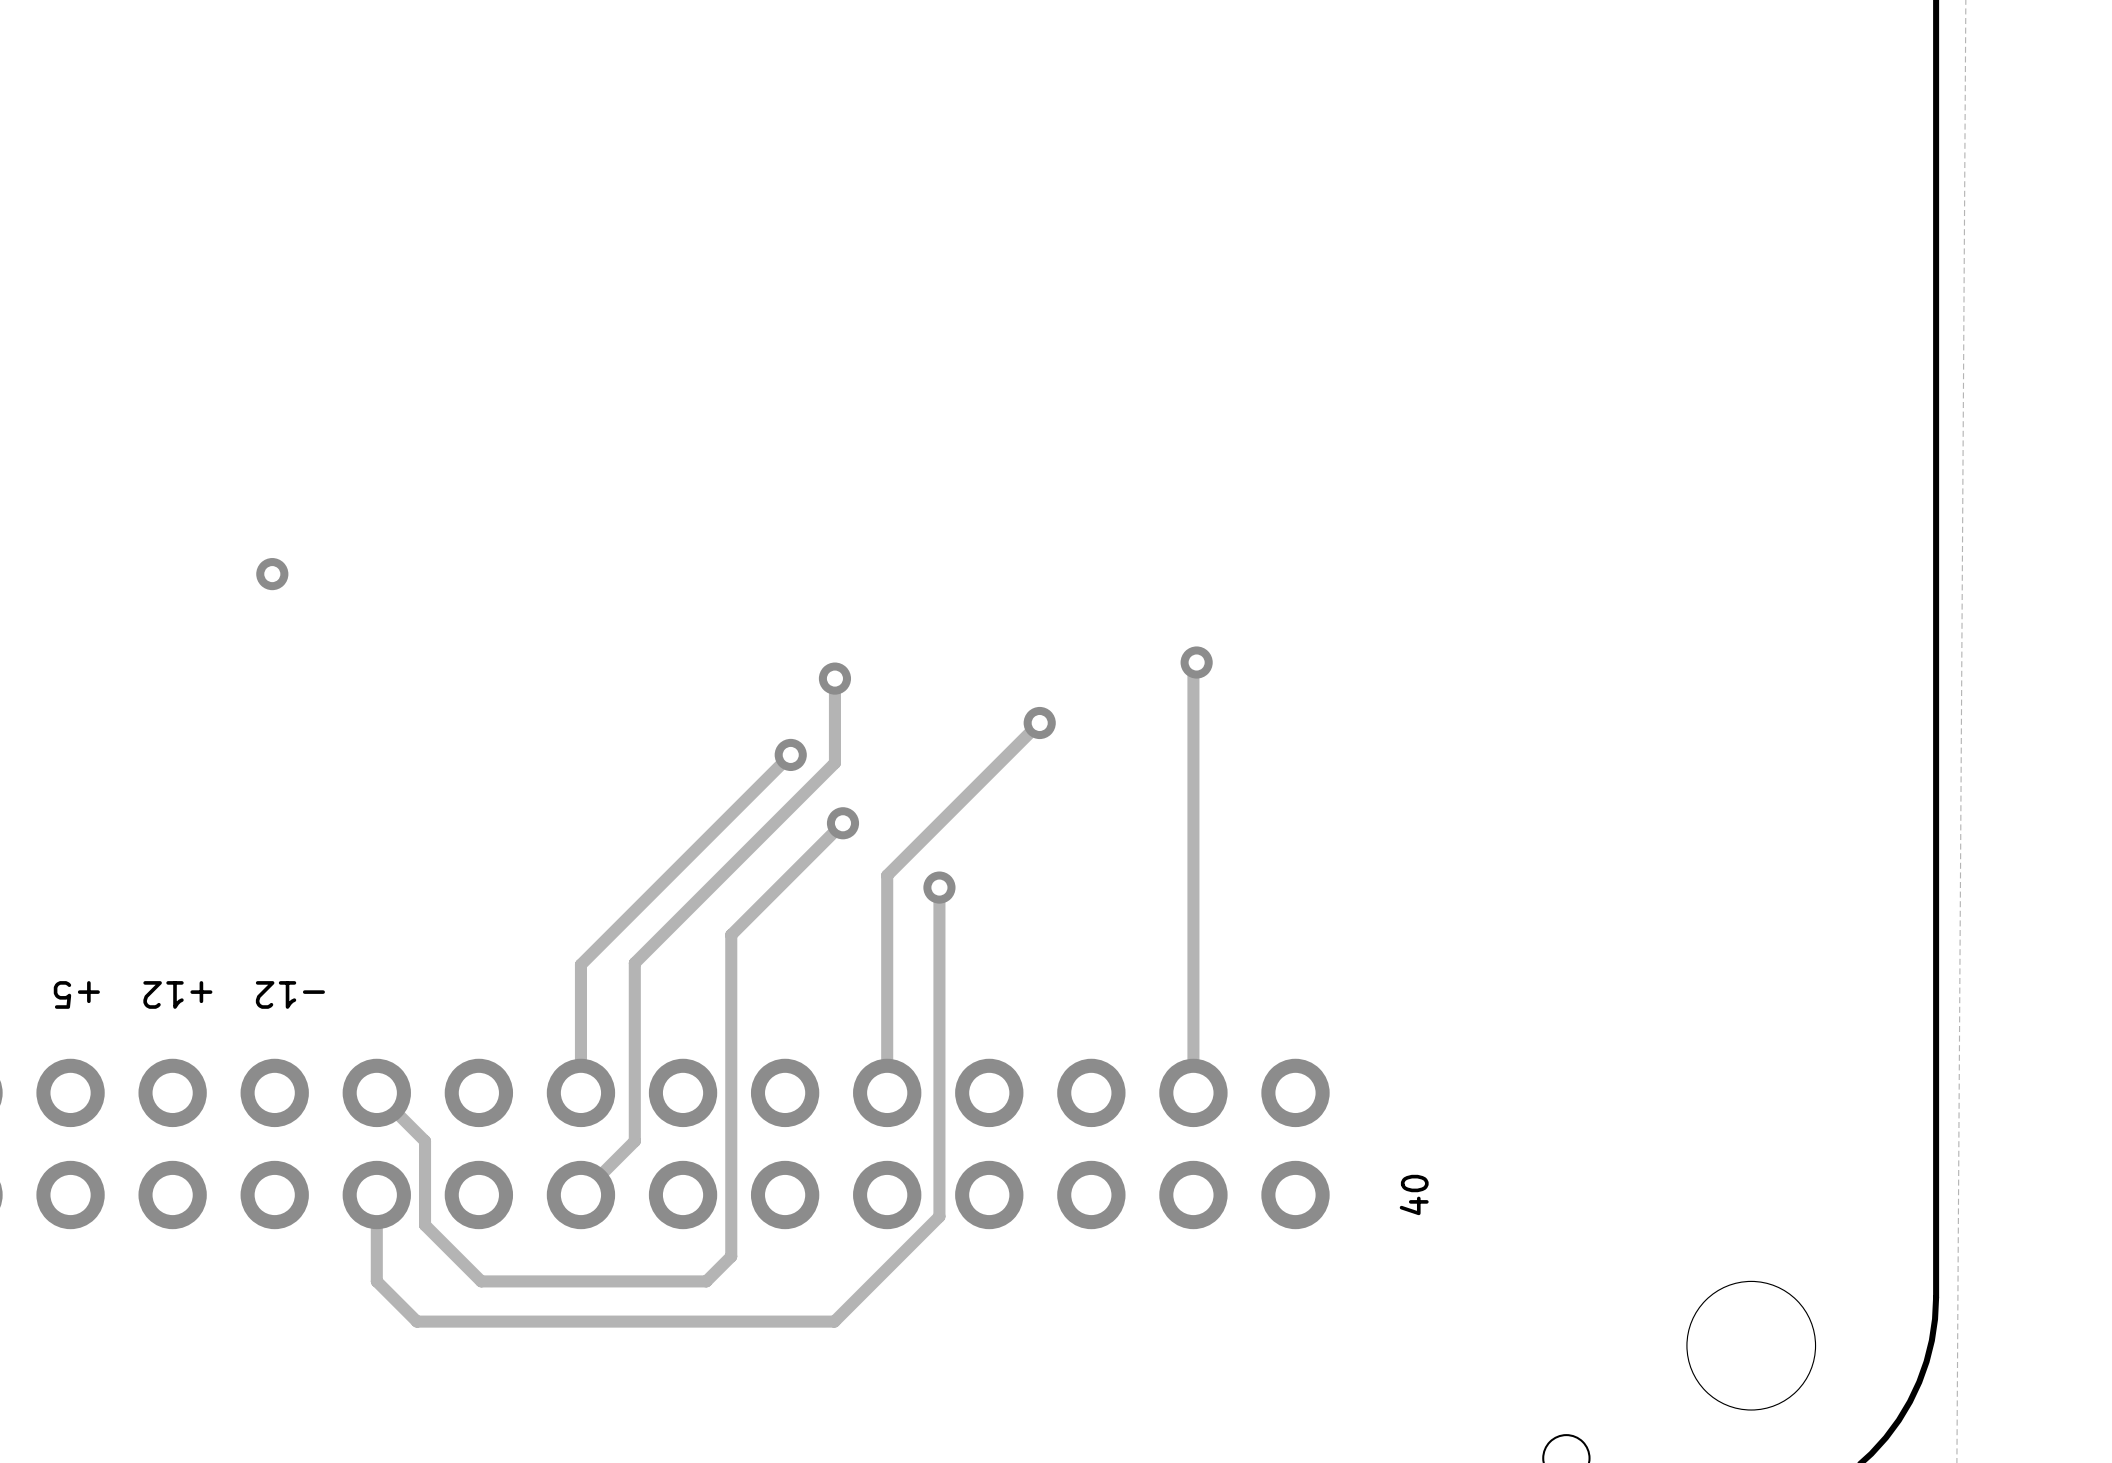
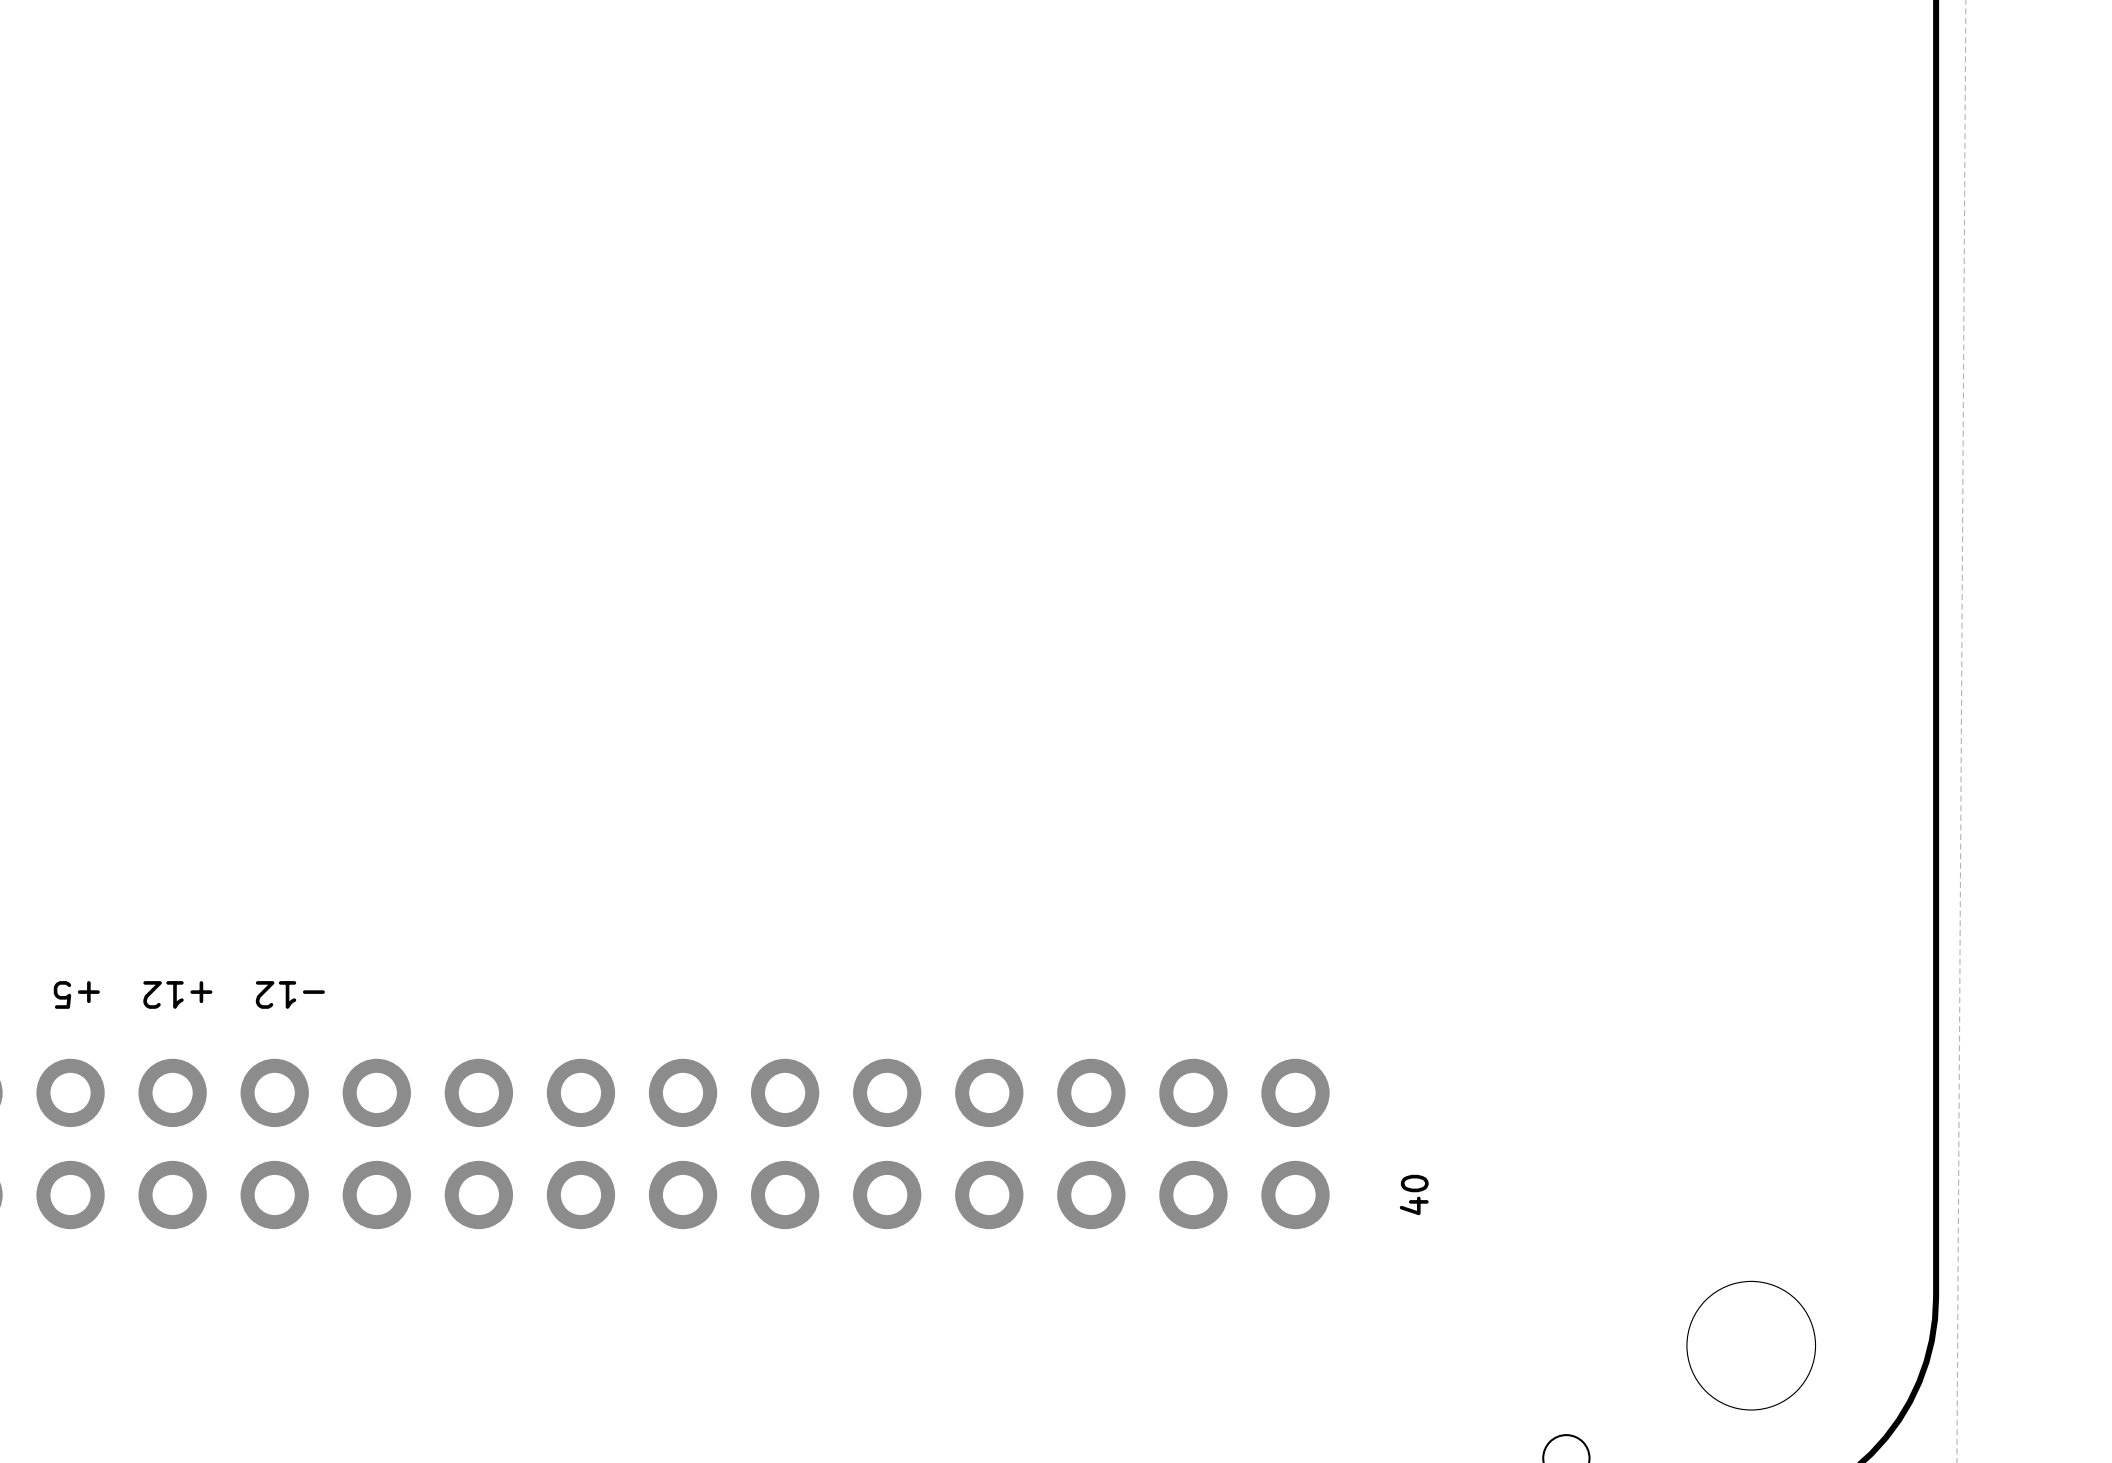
via: (272, 574) -> none
track: (1196, 662) (1193, 665) (1193, 1092) -> none
via: (1196, 662) -> none
track: (834, 678) (834, 762) (634, 963) (634, 1141) (580, 1195) -> none
via: (834, 678) -> none
track: (1039, 722) (887, 875) (887, 1092) -> none
via: (1039, 722) -> none
track: (790, 754) (580, 964) (580, 1092) -> none
via: (790, 754) -> none
track: (842, 823) (731, 934) (731, 1256) (706, 1281) (481, 1281) (425, 1225) (425, 1141) (376, 1092) -> none
via: (842, 823) -> none
track: (939, 887) (939, 1216) (834, 1321) (416, 1321) (376, 1281) (376, 1195) -> none
via: (939, 887) -> none

